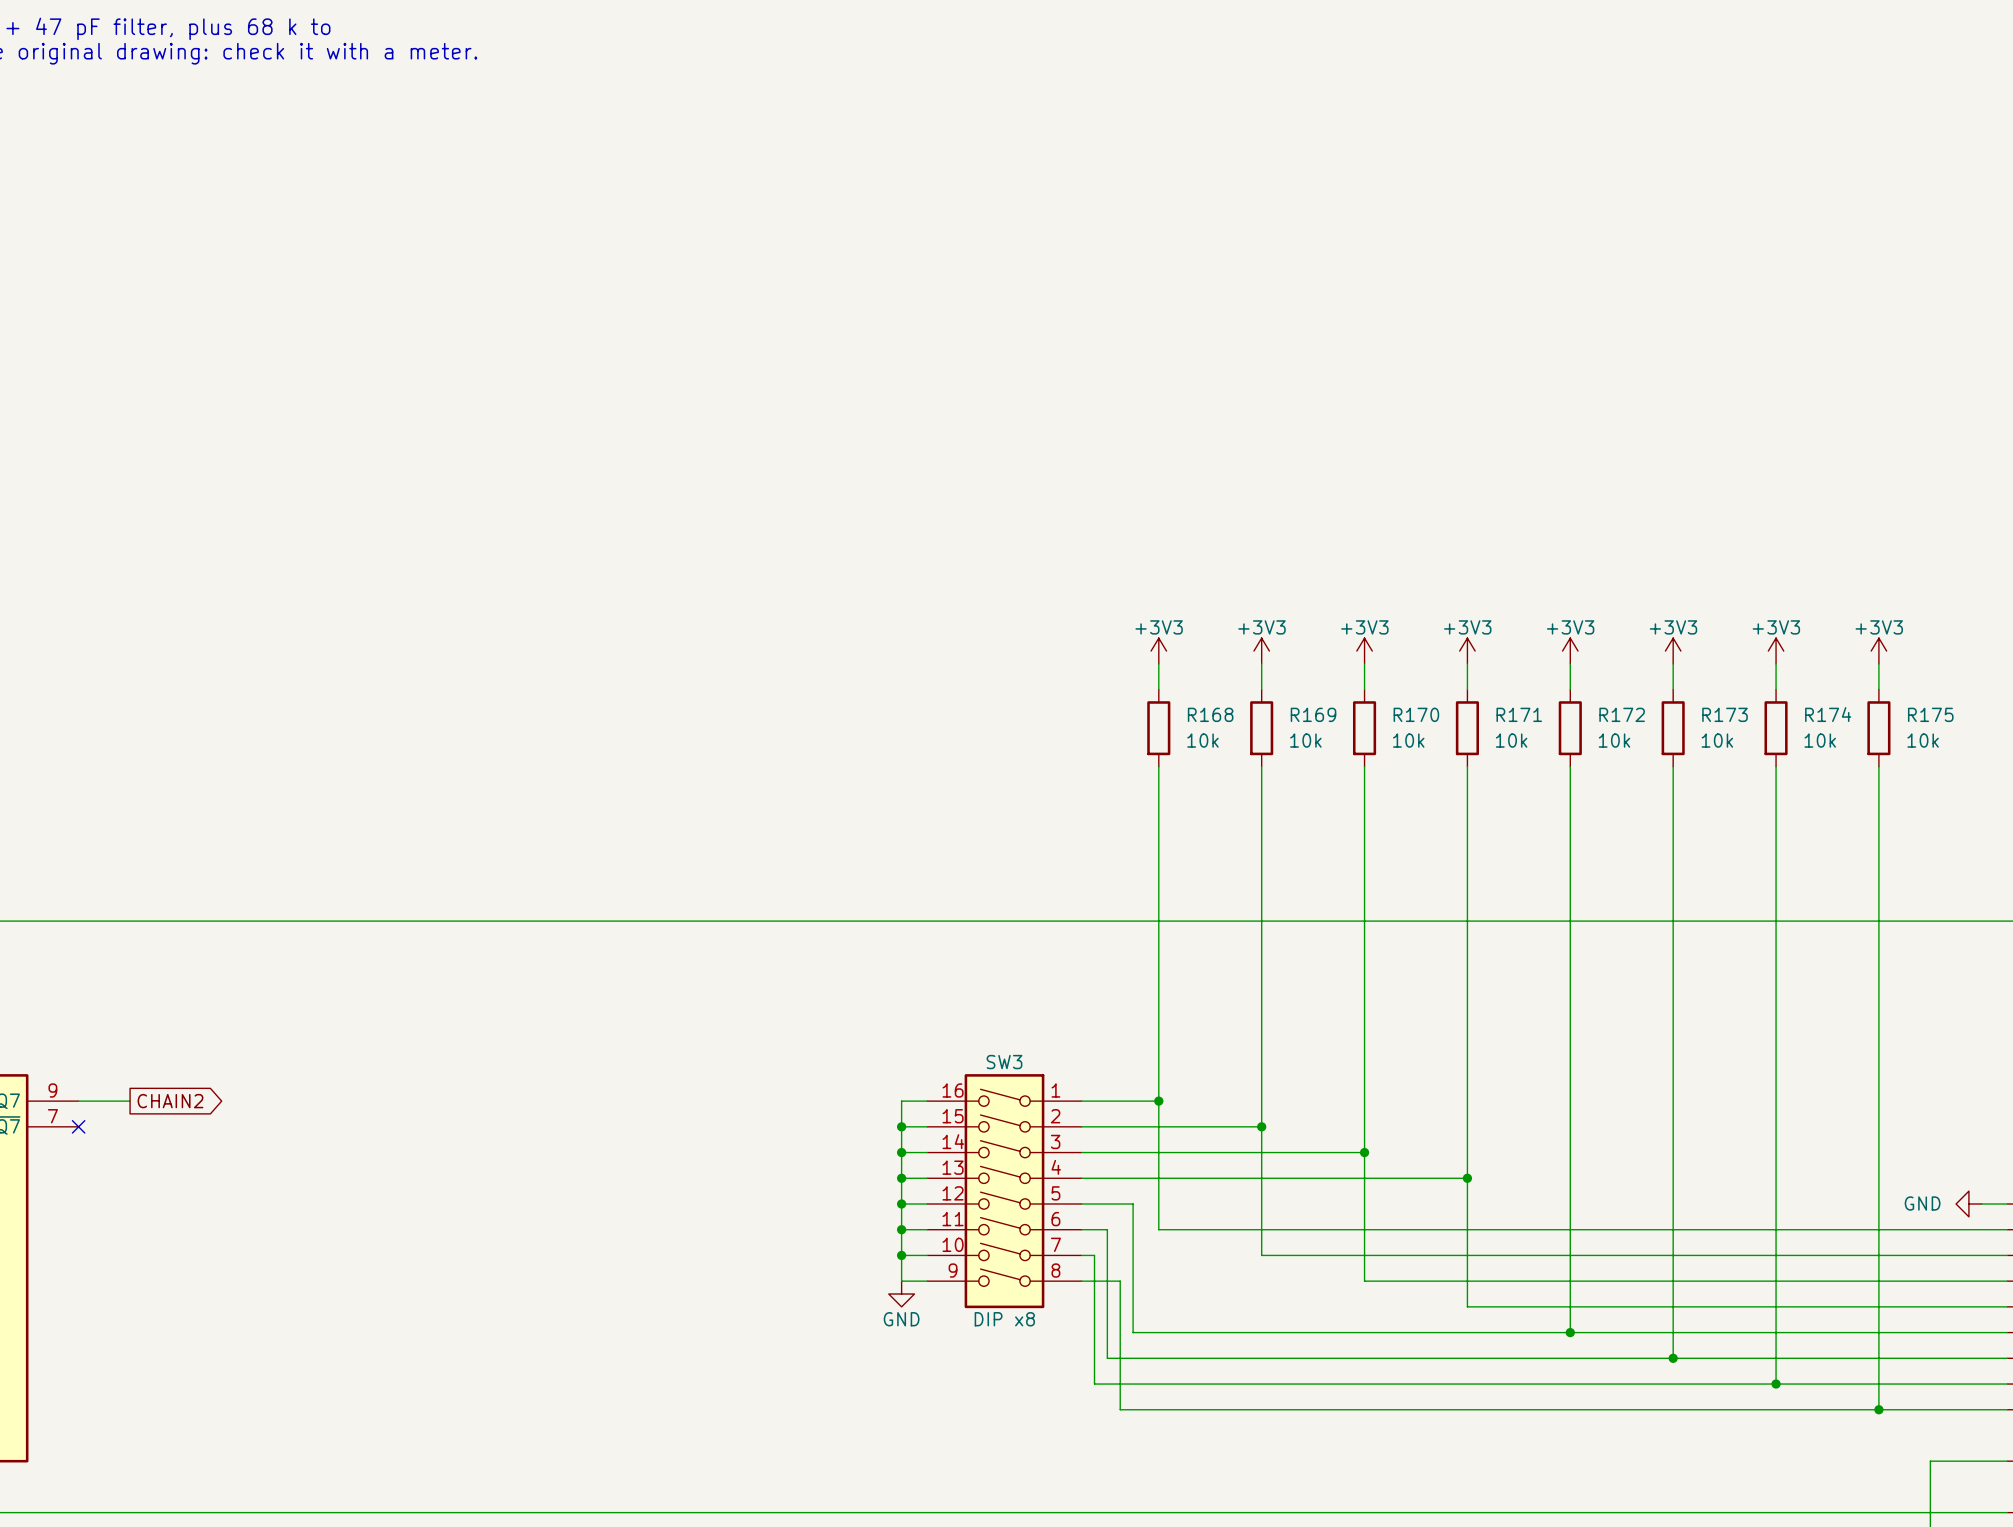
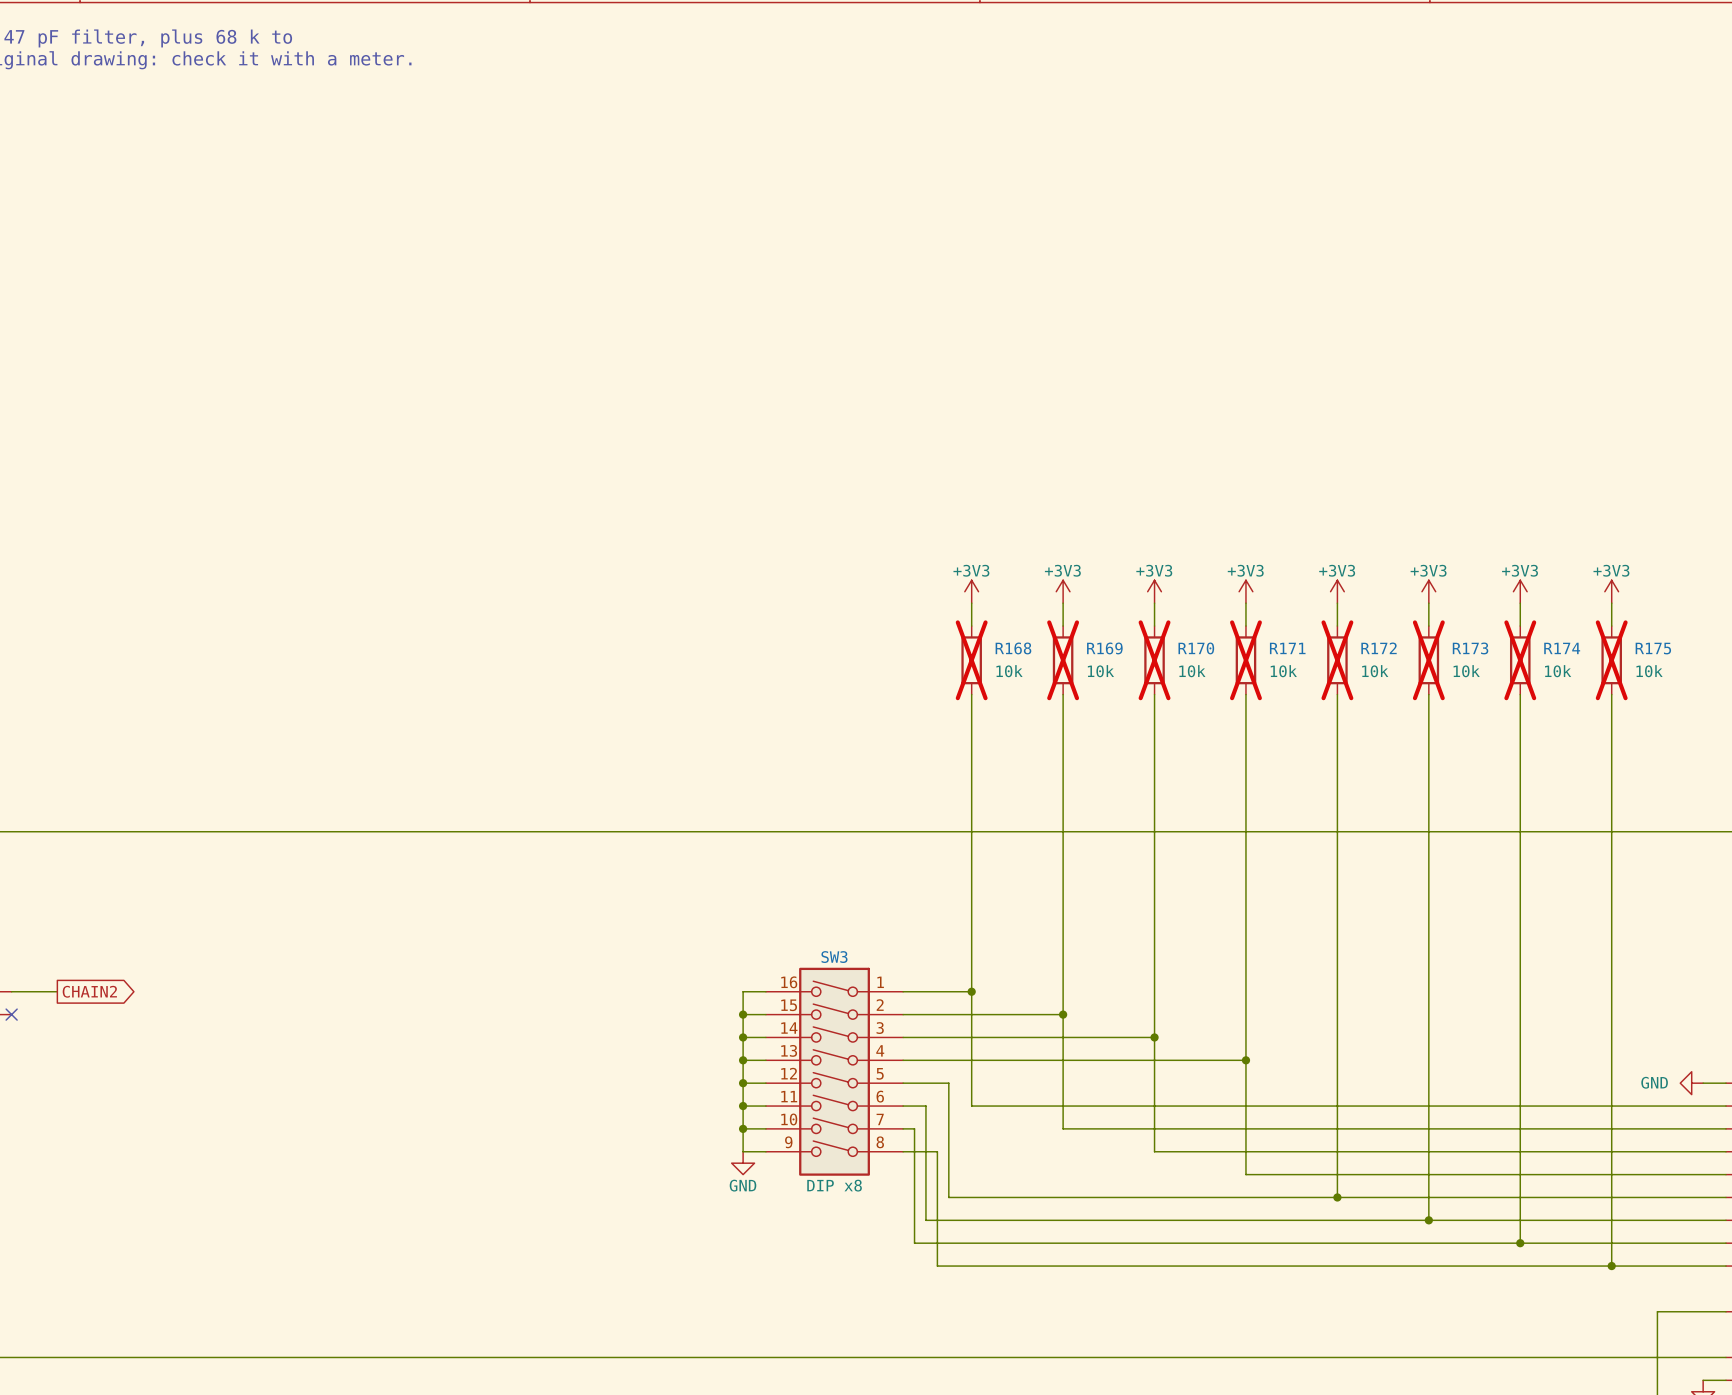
R168 do-not-place cross: none -> (971, 660)
R169 do-not-place cross: none -> (1063, 660)
R170 do-not-place cross: none -> (1154, 660)
R171 do-not-place cross: none -> (1245, 660)
R172 do-not-place cross: none -> (1337, 660)
R173 do-not-place cross: none -> (1428, 660)
R174 do-not-place cross: none -> (1520, 660)
R175 do-not-place cross: none -> (1611, 660)

